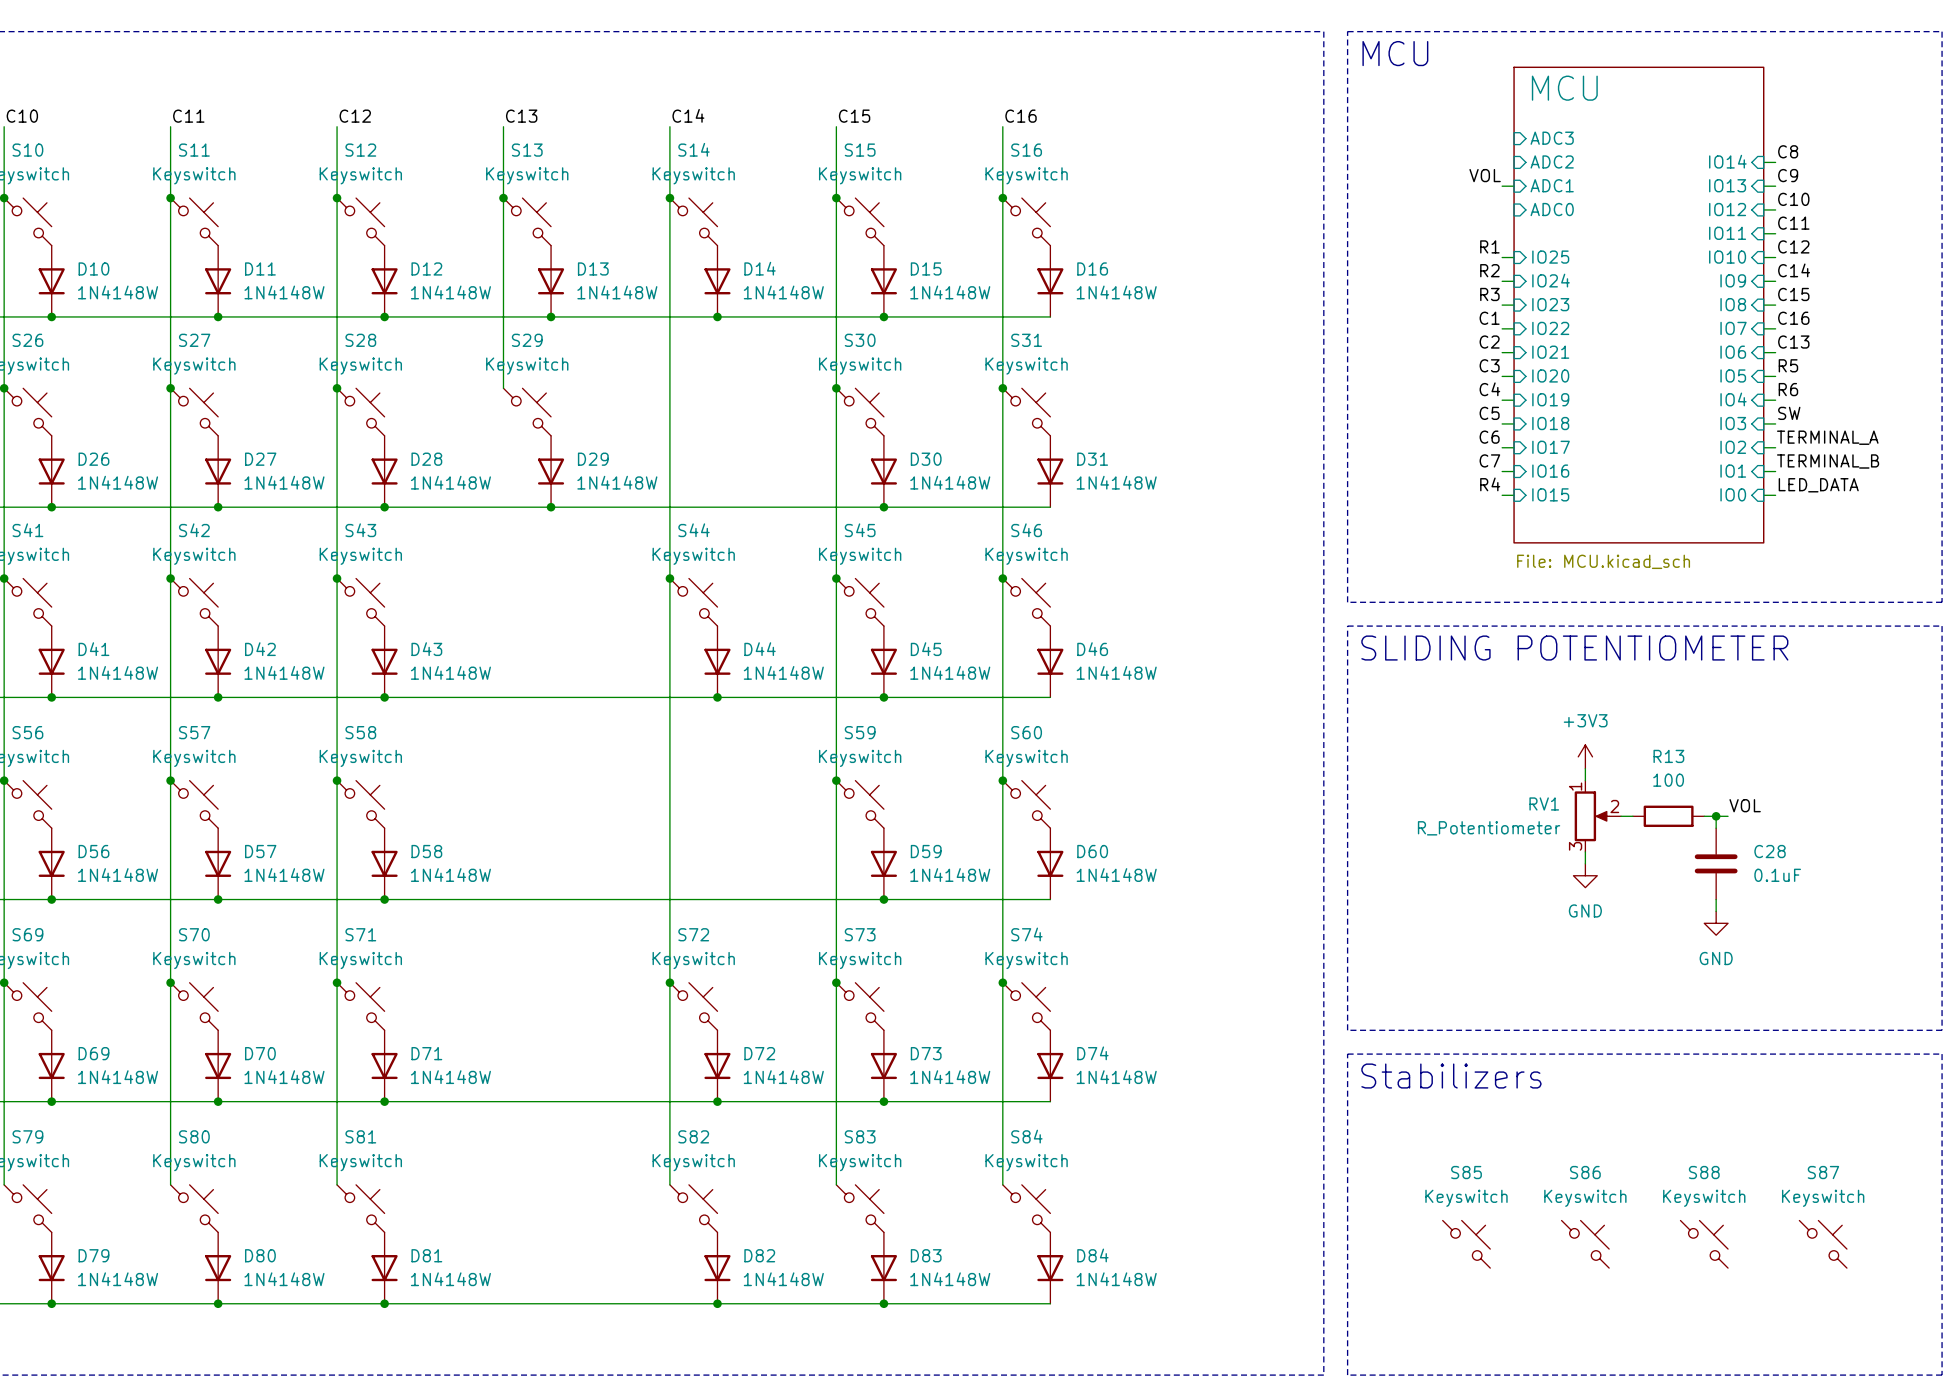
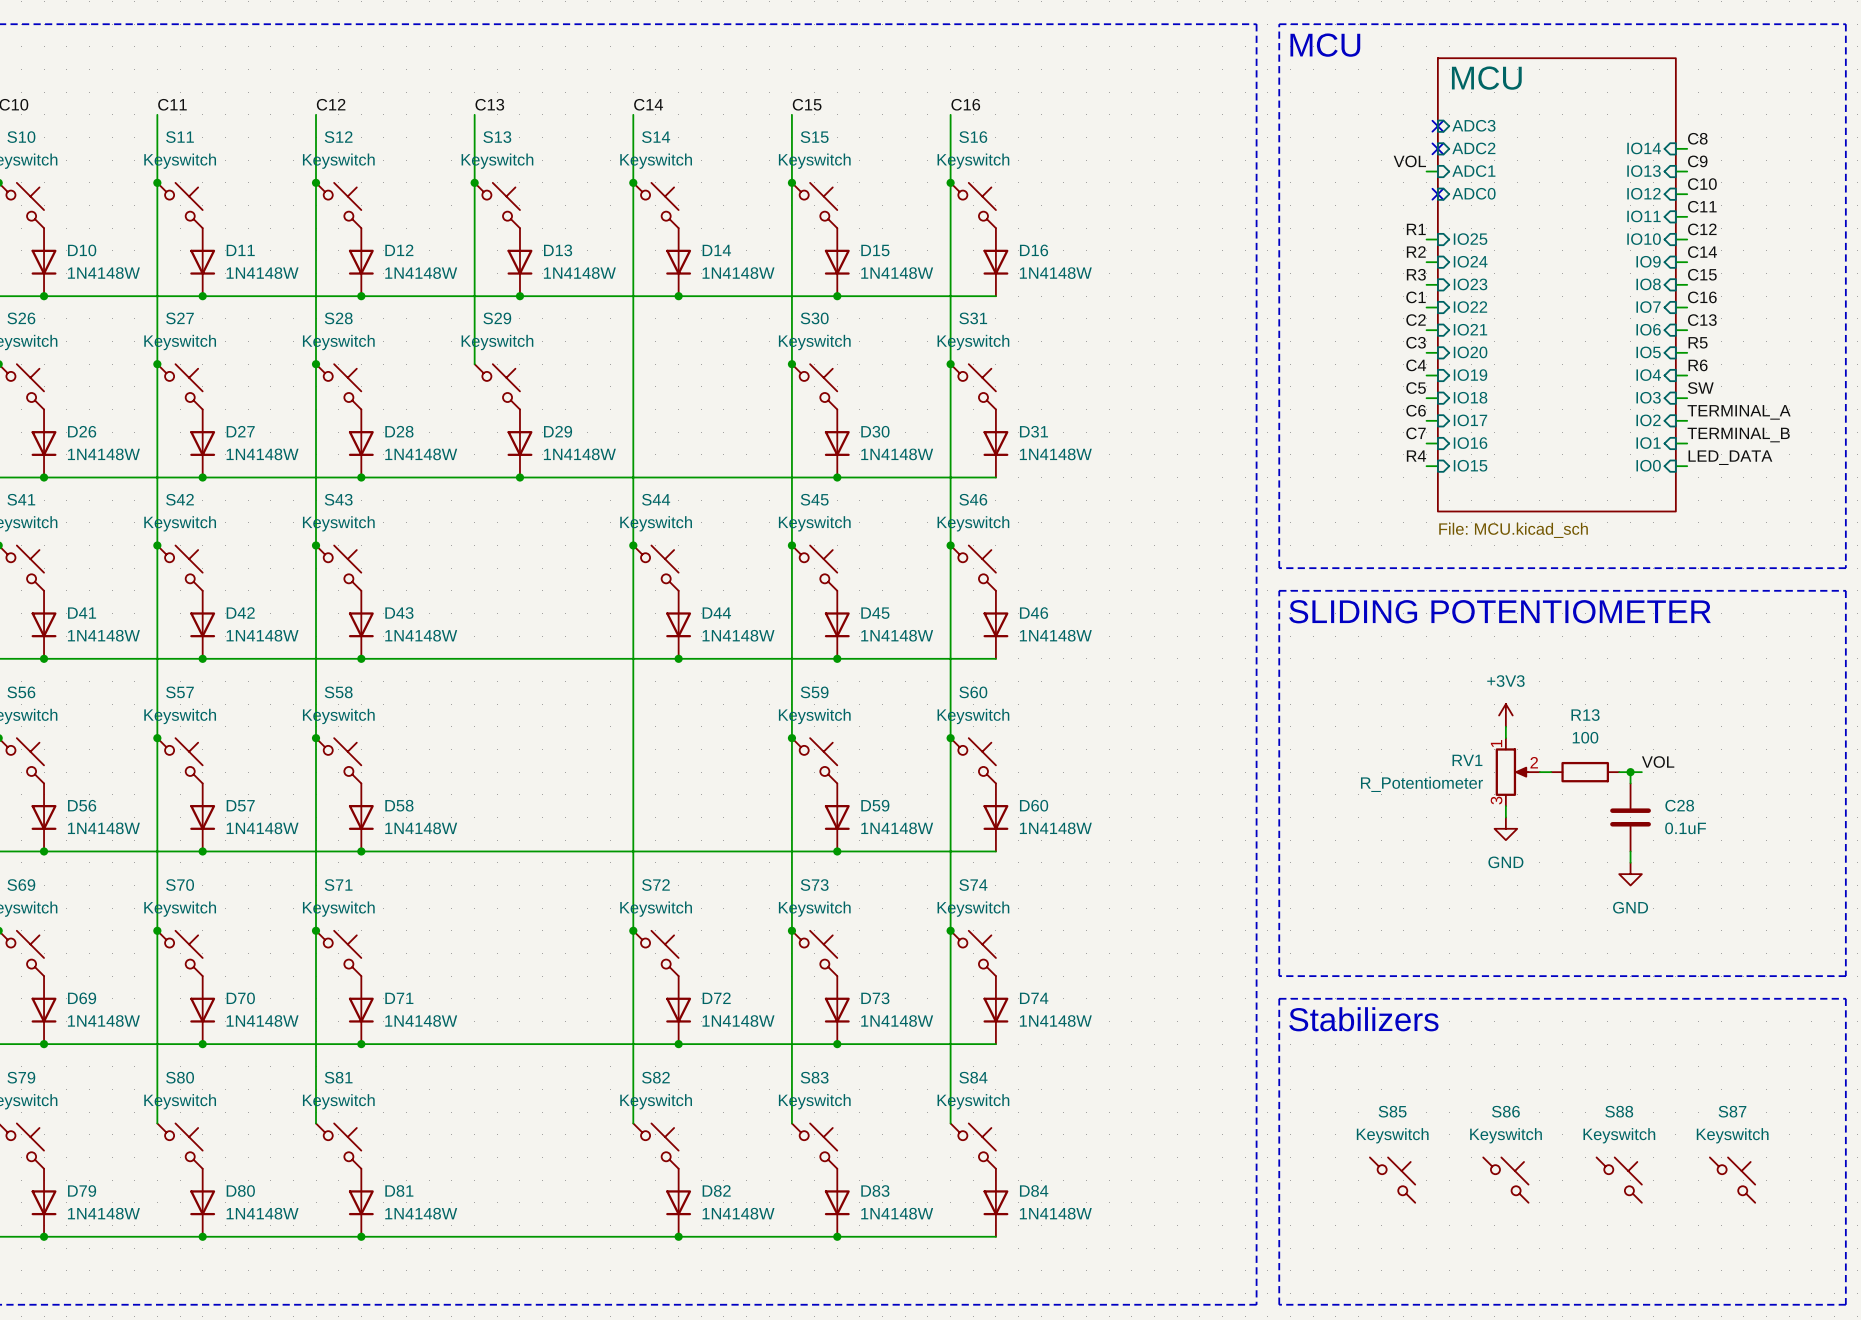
no-connect mark: none -> (1437, 126)
no-connect mark: none -> (1437, 148)
no-connect mark: none -> (1437, 194)

